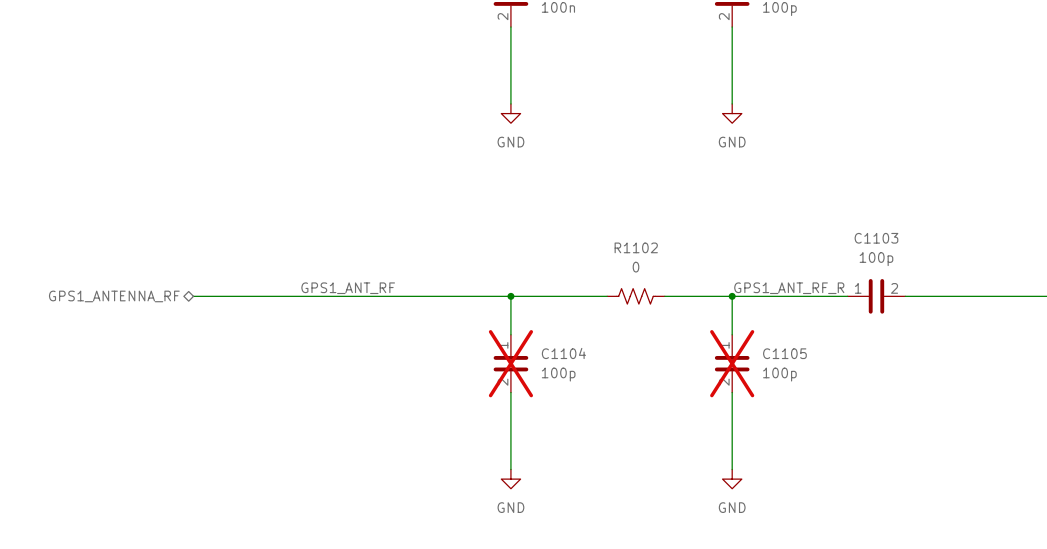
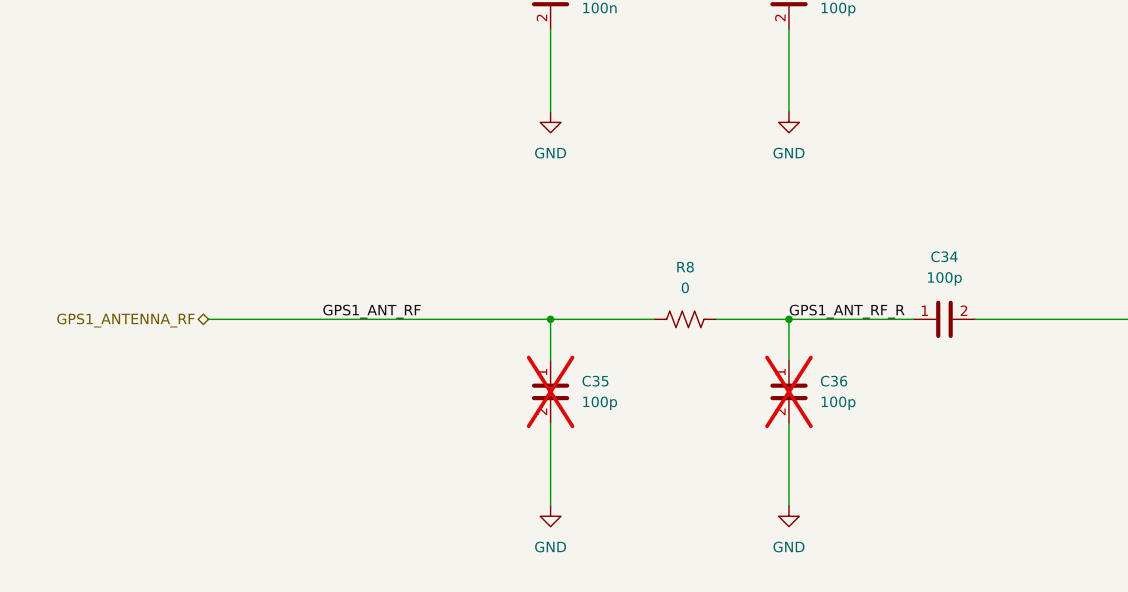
C1103 name: C1103 (876, 238) -> C34 (944, 256)
R1102 name: R1102 (636, 247) -> R8 (685, 267)
C1104 name: C1104 (563, 353) -> C35 (595, 381)
C1105 name: C1105 (784, 353) -> C36 (834, 381)

